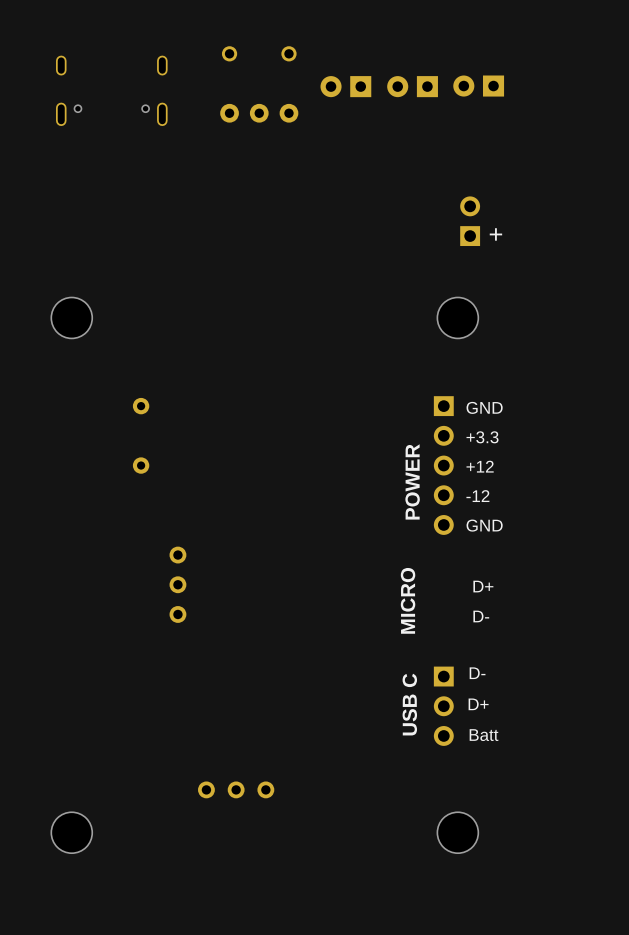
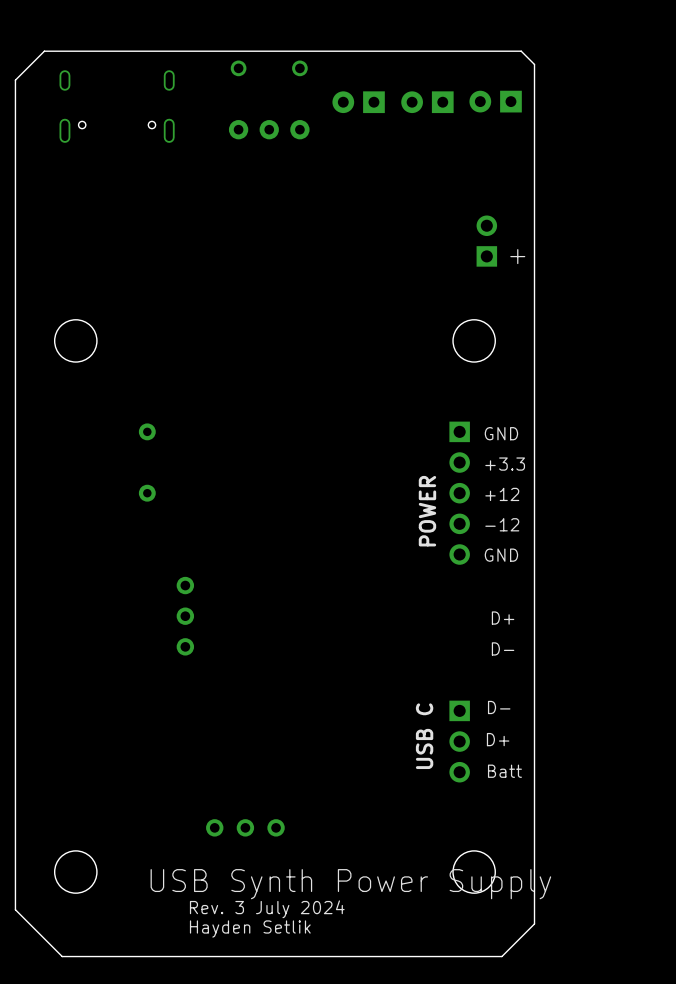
board edge: none -> (521, 51) (44, 51) (15, 80) (15, 909) (62, 956) (501, 956) (534, 923) (534, 64) (521, 51)
text: MICRO (408, 600) -> none
text: none -> USB Synth Power Supply (350, 884)
text: none -> Rev. 3 July 2024 (267, 909)
text: none -> Hayden Setlik (250, 929)

